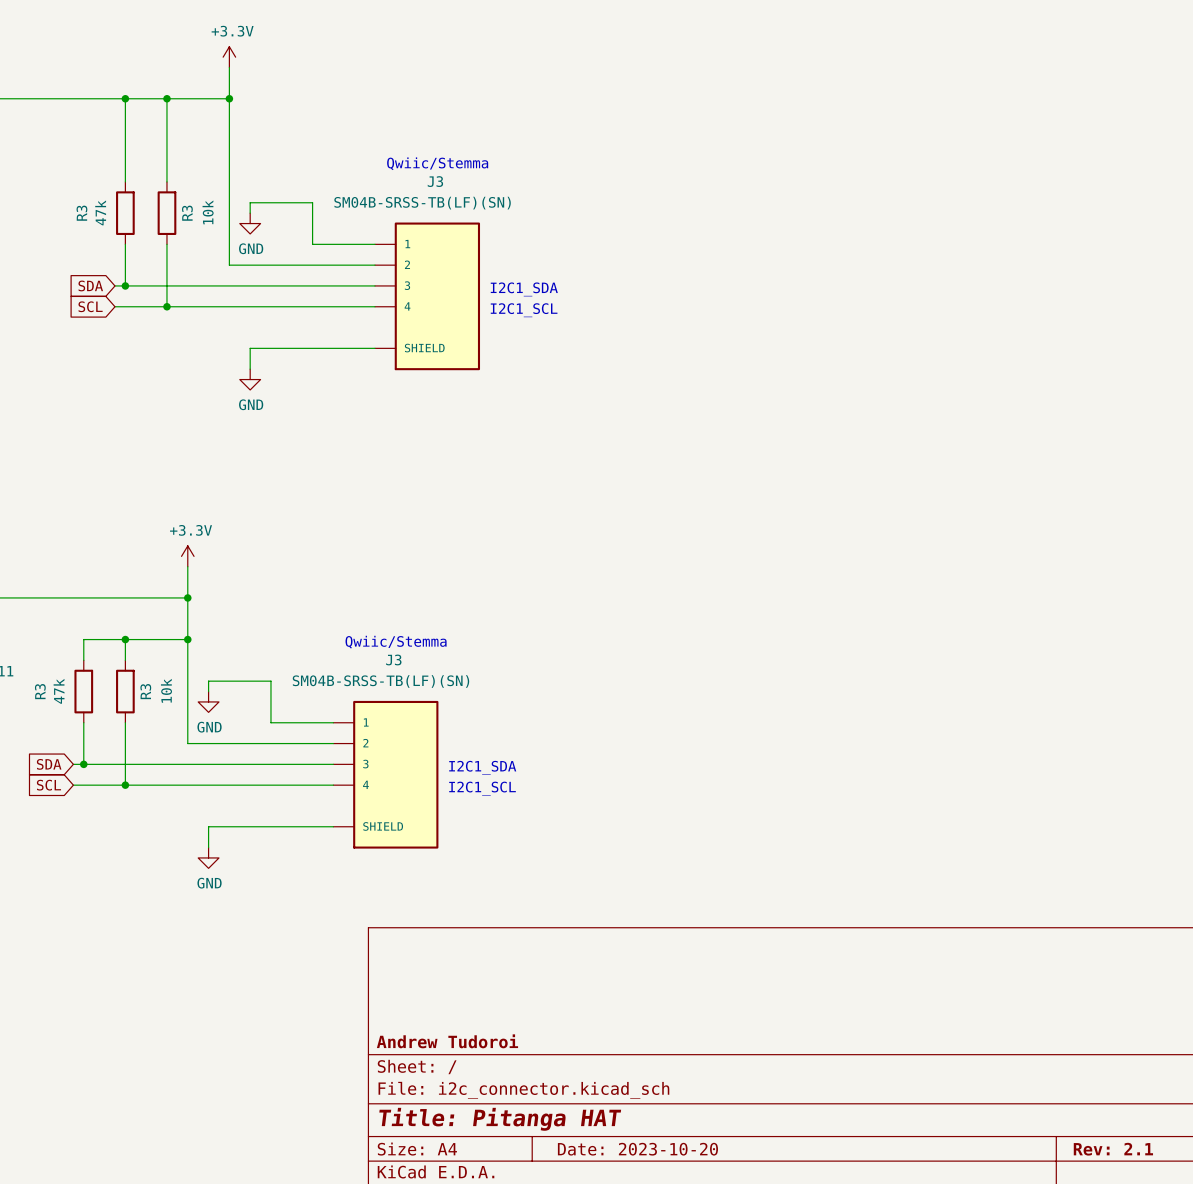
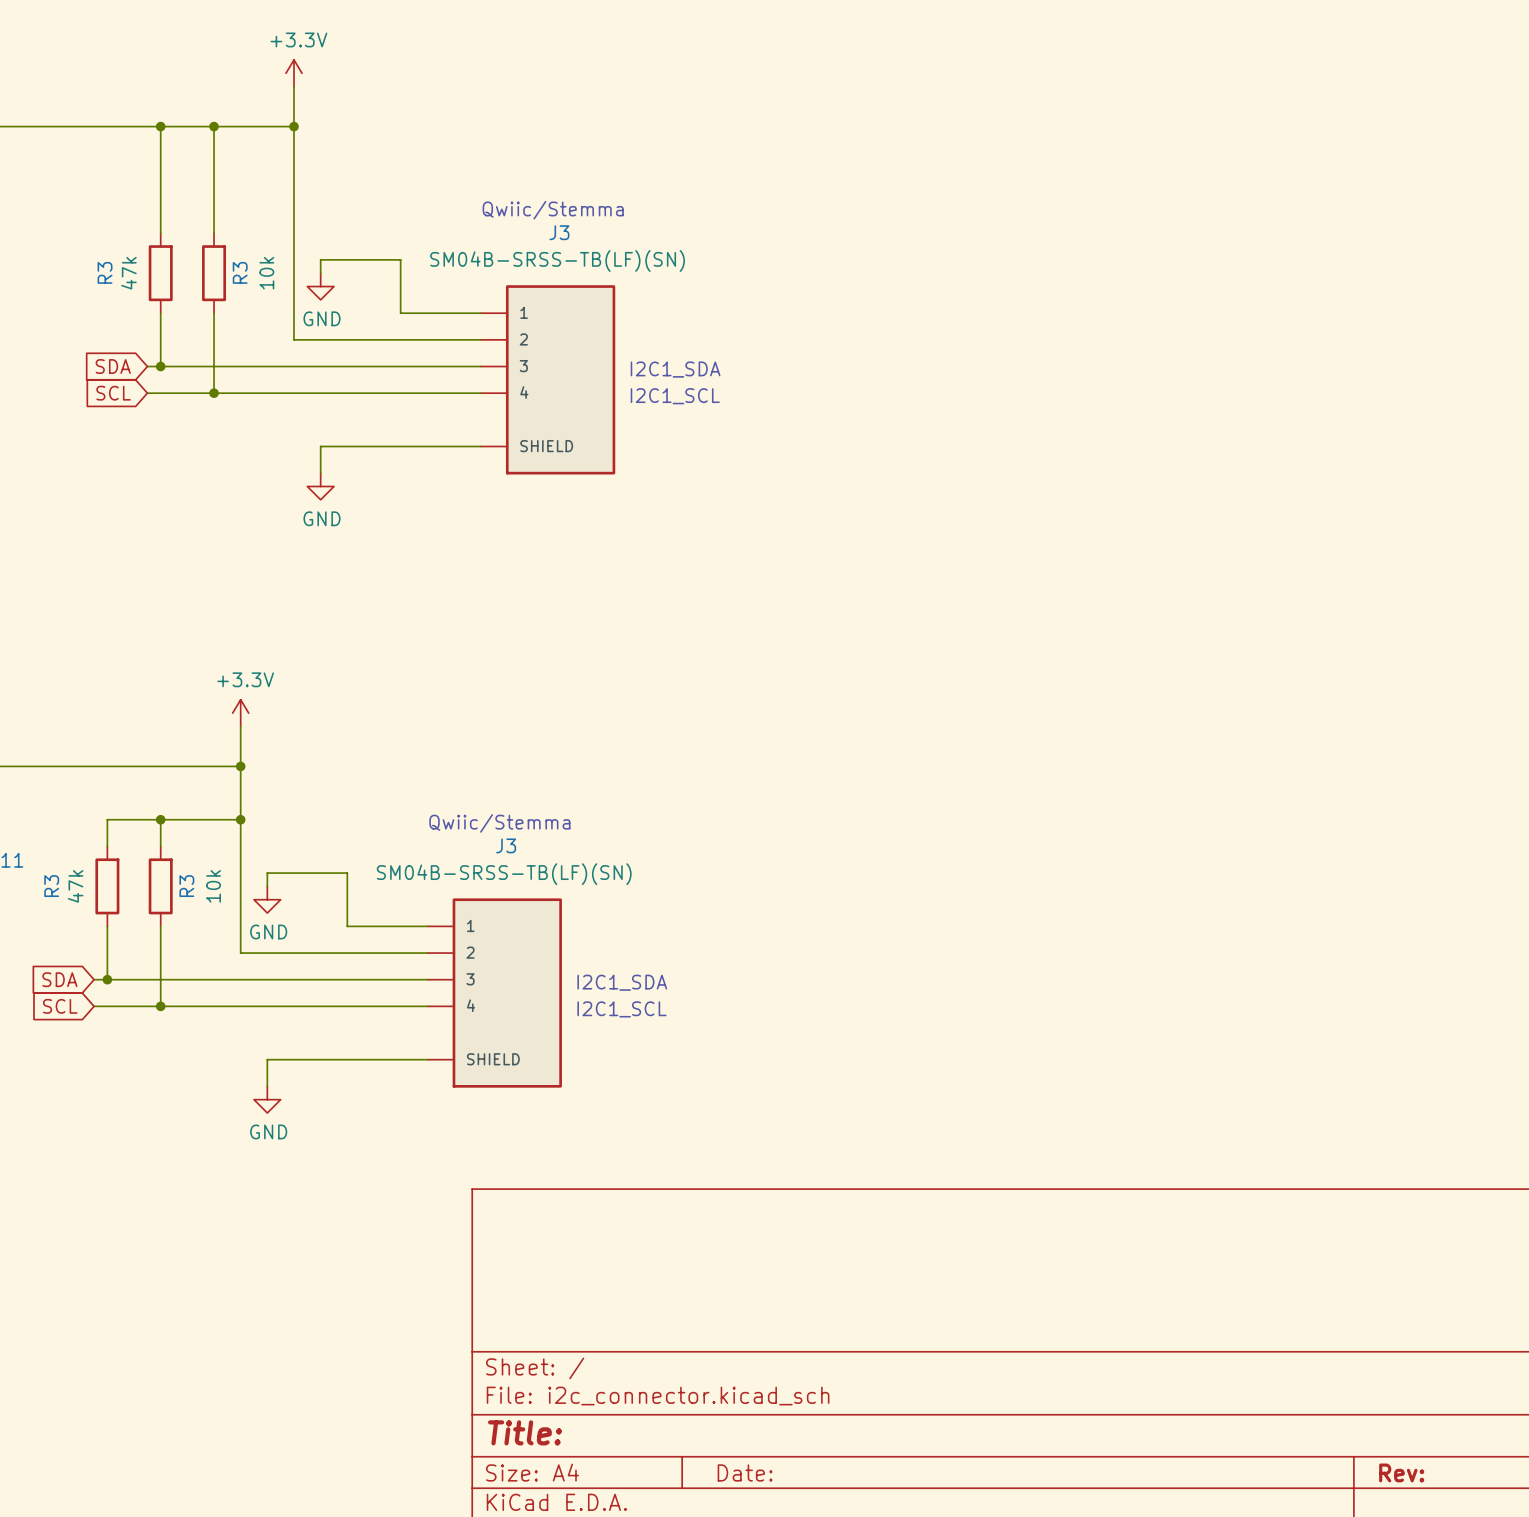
title block: Andrew Tudoroi (447, 1041) -> none
title block: Title: Pitanga HAT (500, 1119) -> Title: (525, 1432)
title block: Date: 2023-10-20 (637, 1149) -> Date: (745, 1472)
title block: Rev: 2.1 (1113, 1149) -> Rev: (1401, 1472)

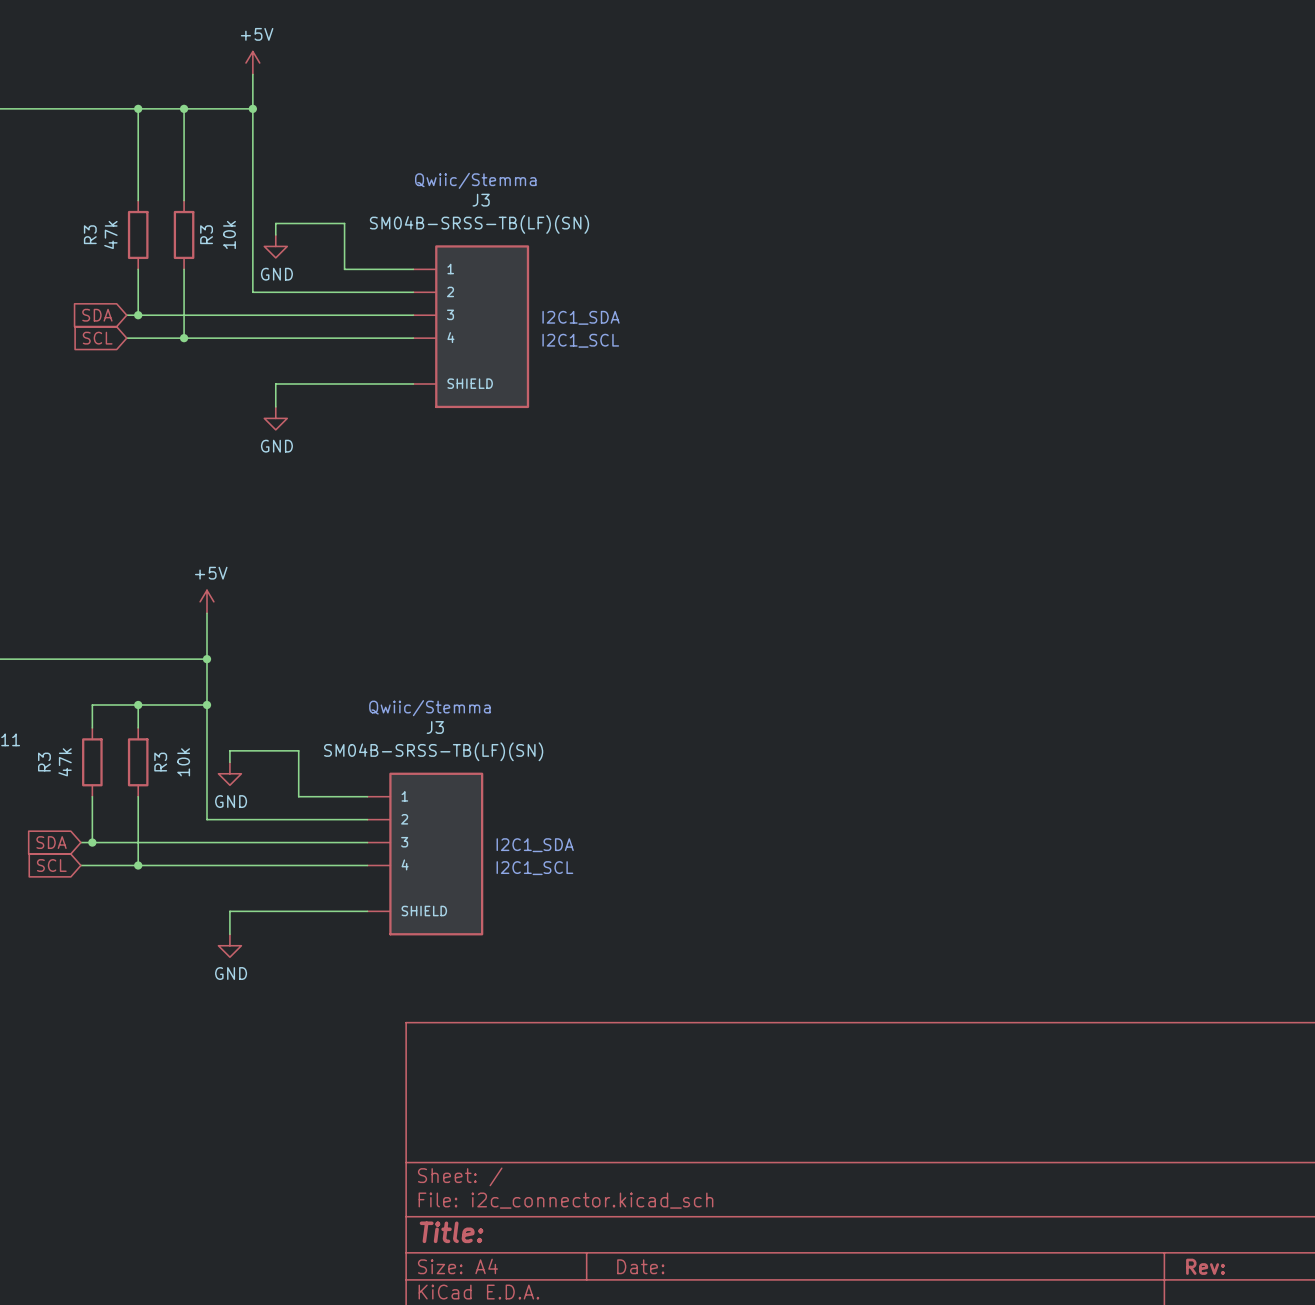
power symbol: +3.3V (294, 73) -> +5V (252, 63)
power symbol: none -> +5V (206, 601)
power symbol: +3.3V (240, 713) -> none

